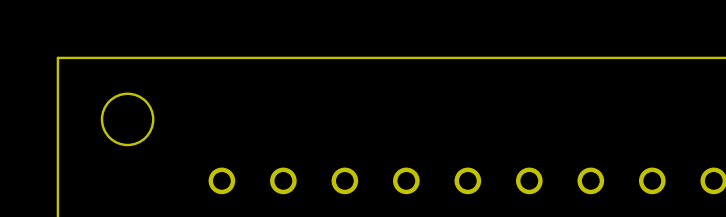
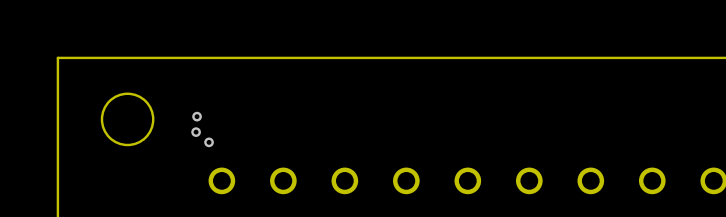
via: none -> (197, 116)
via: none -> (196, 132)
via: none -> (209, 142)

